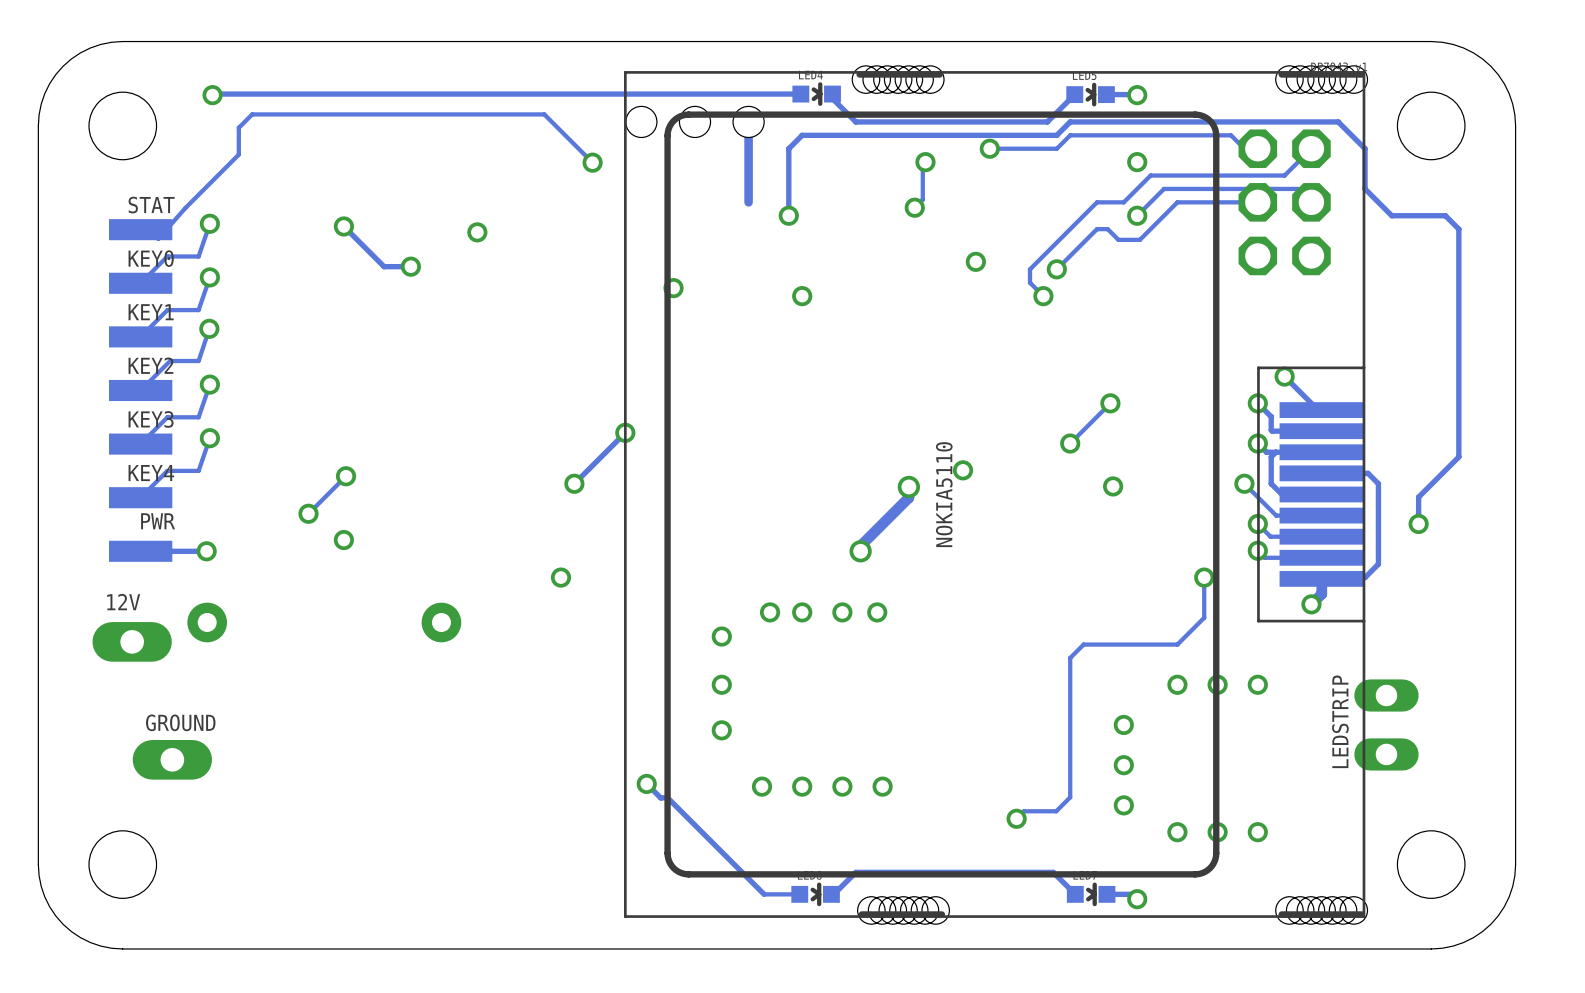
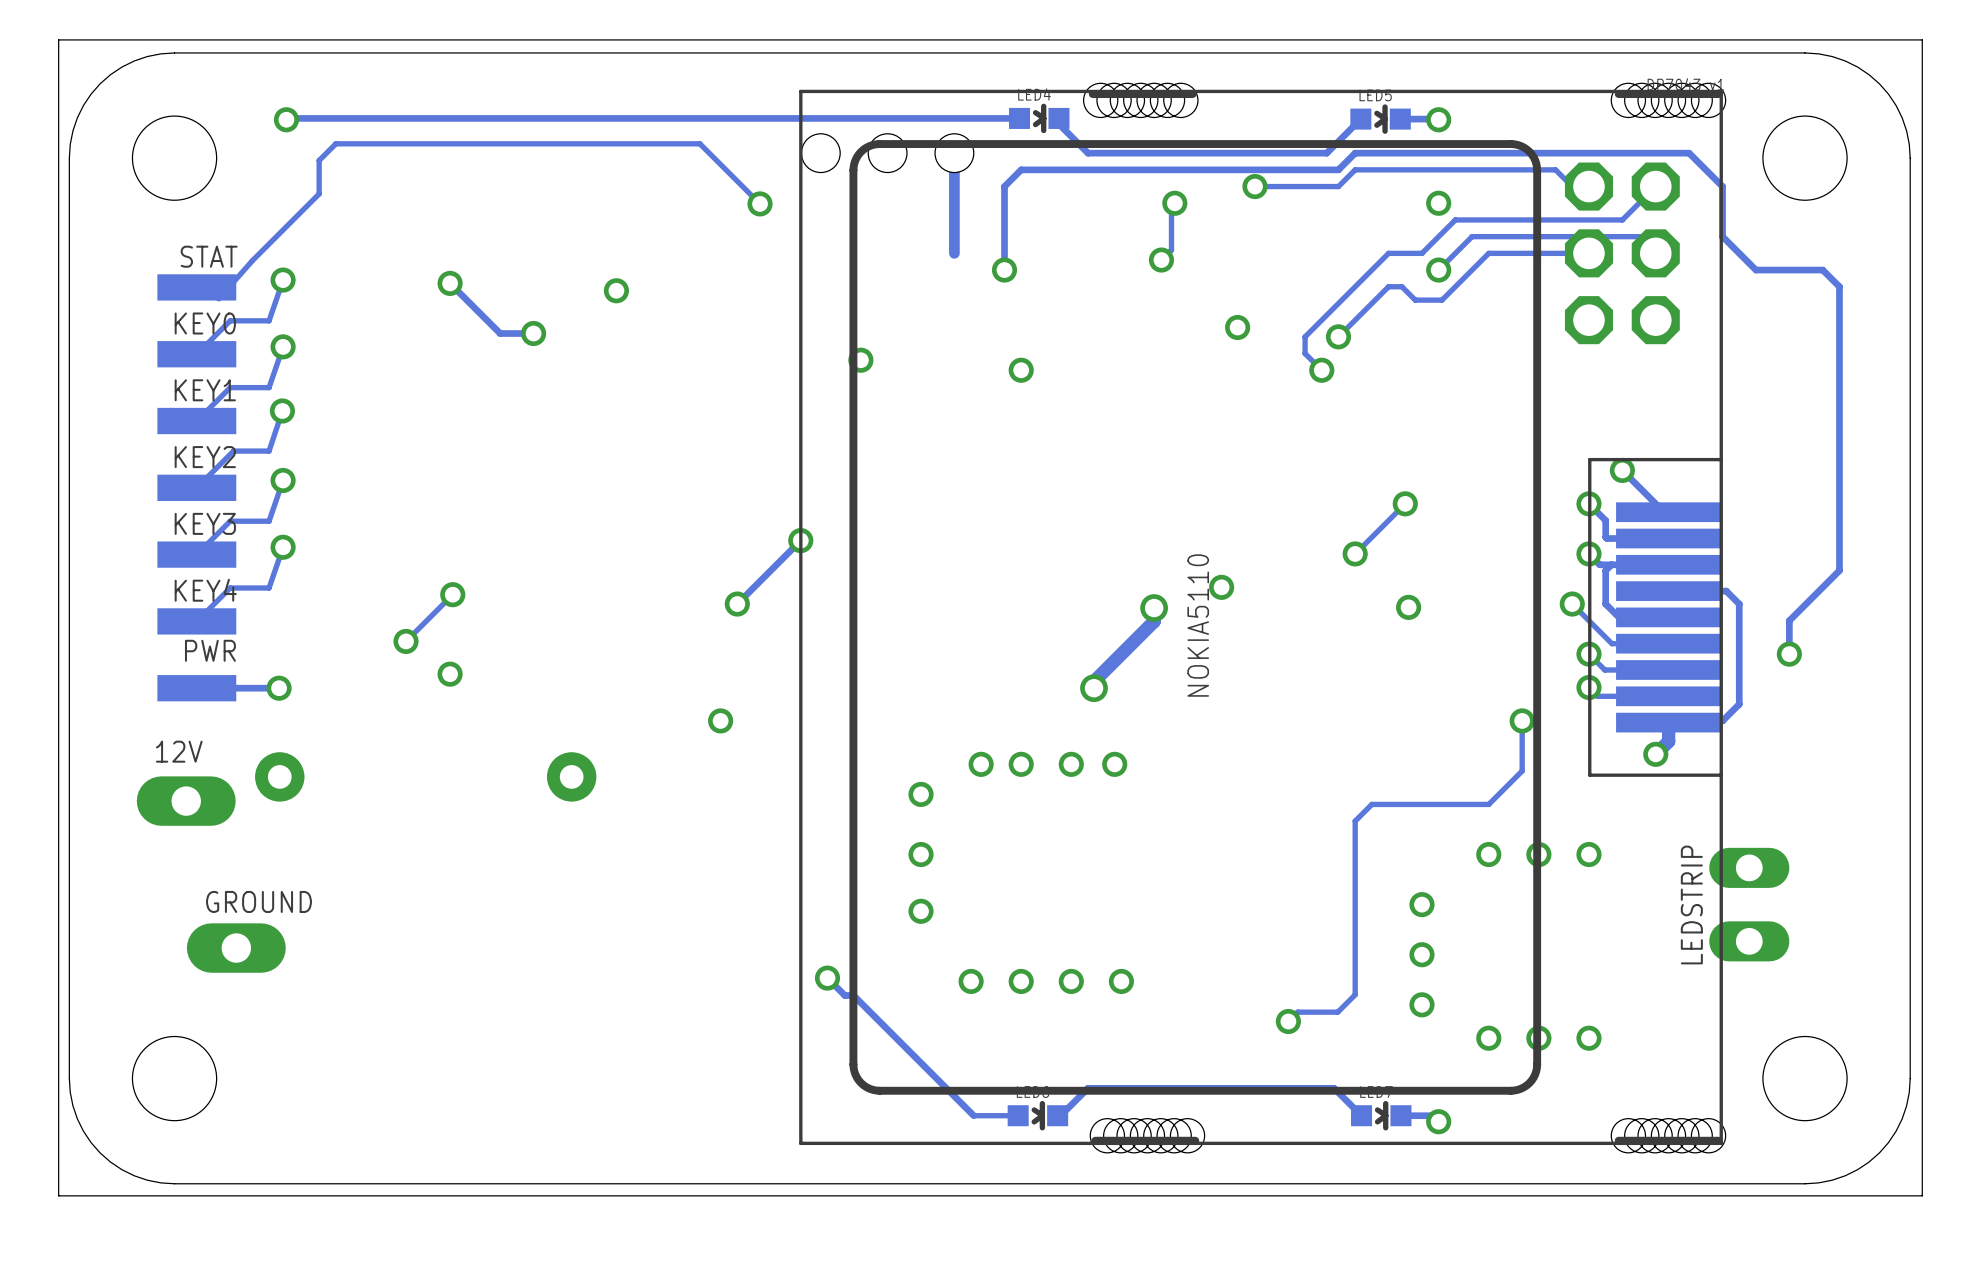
board edge: none -> (1922, 39) (58, 39) (58, 1195) (1922, 1195) (1922, 39)

